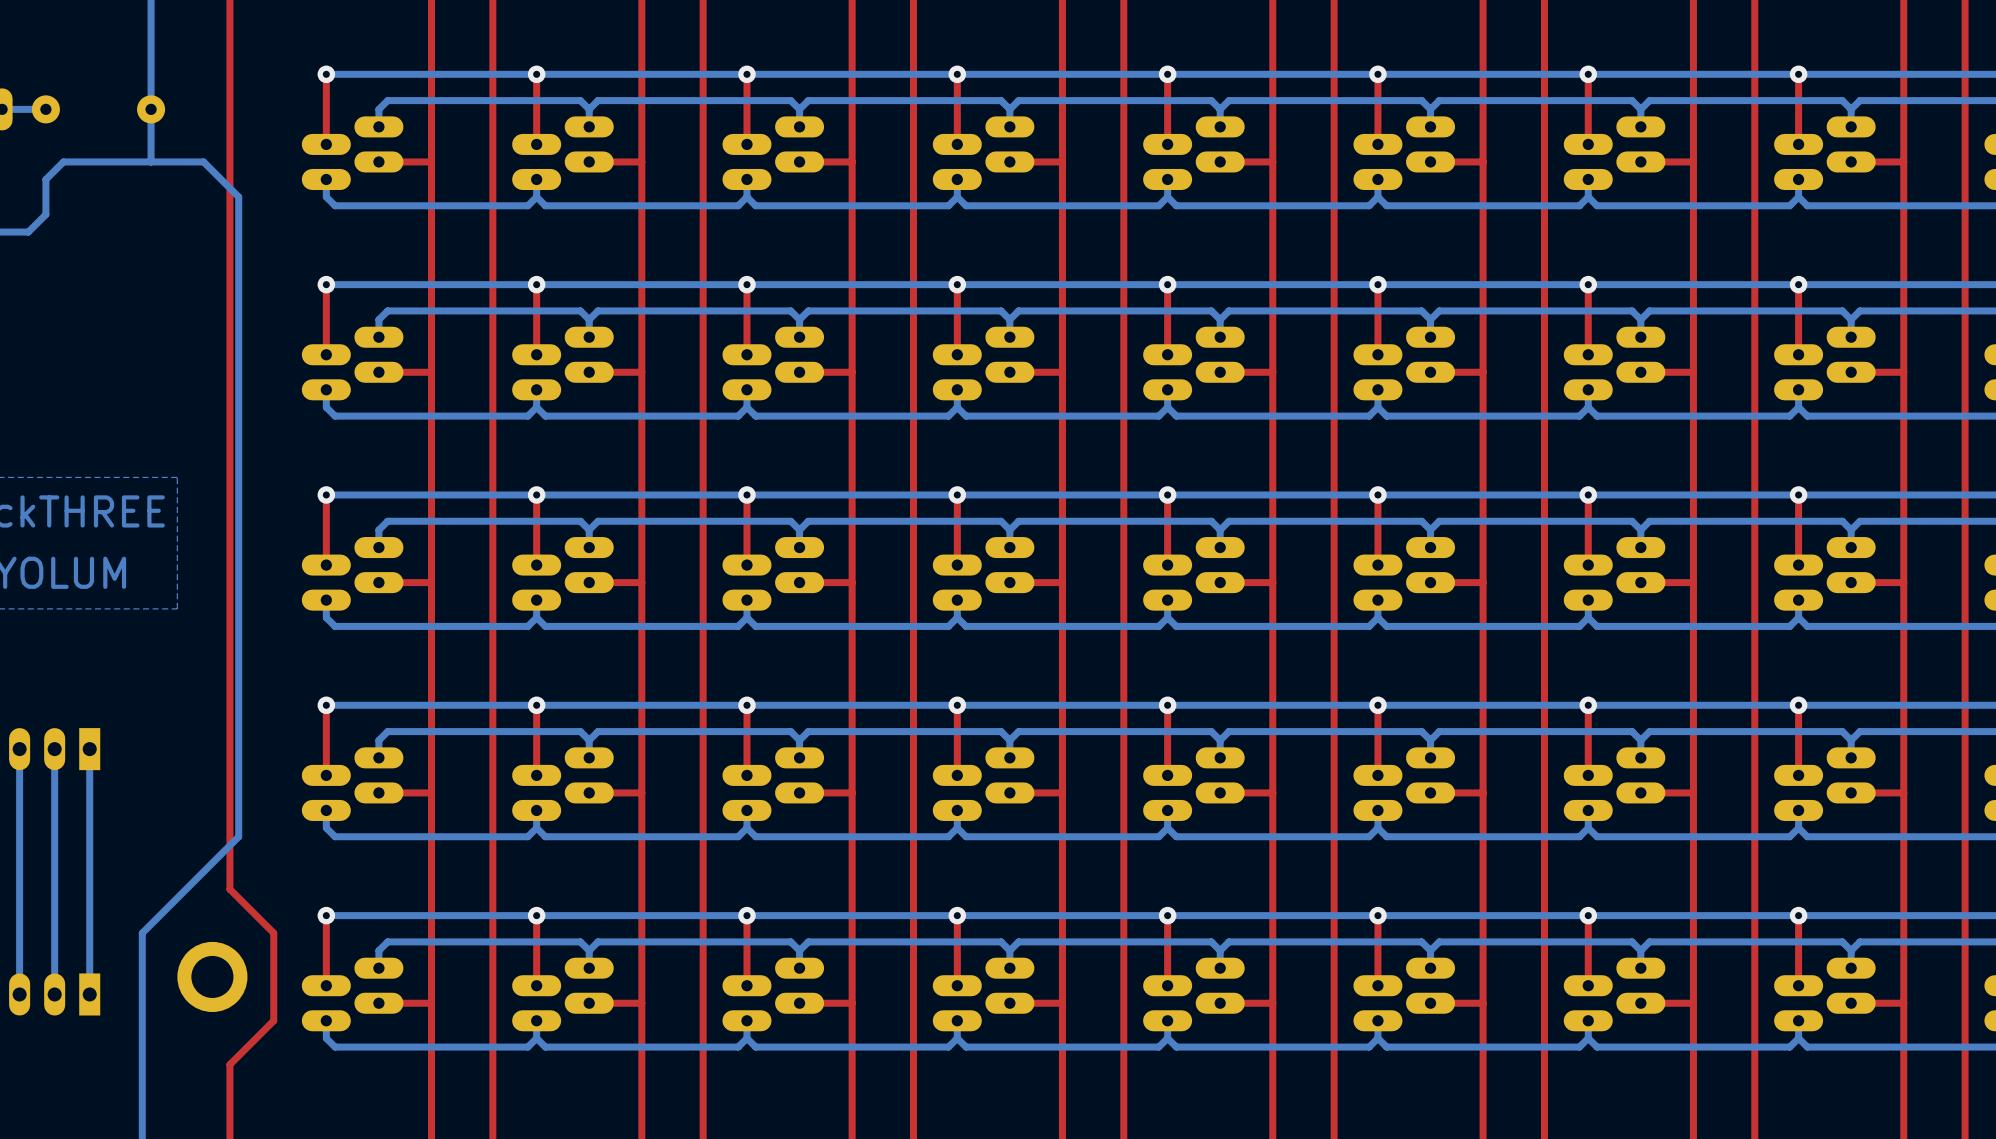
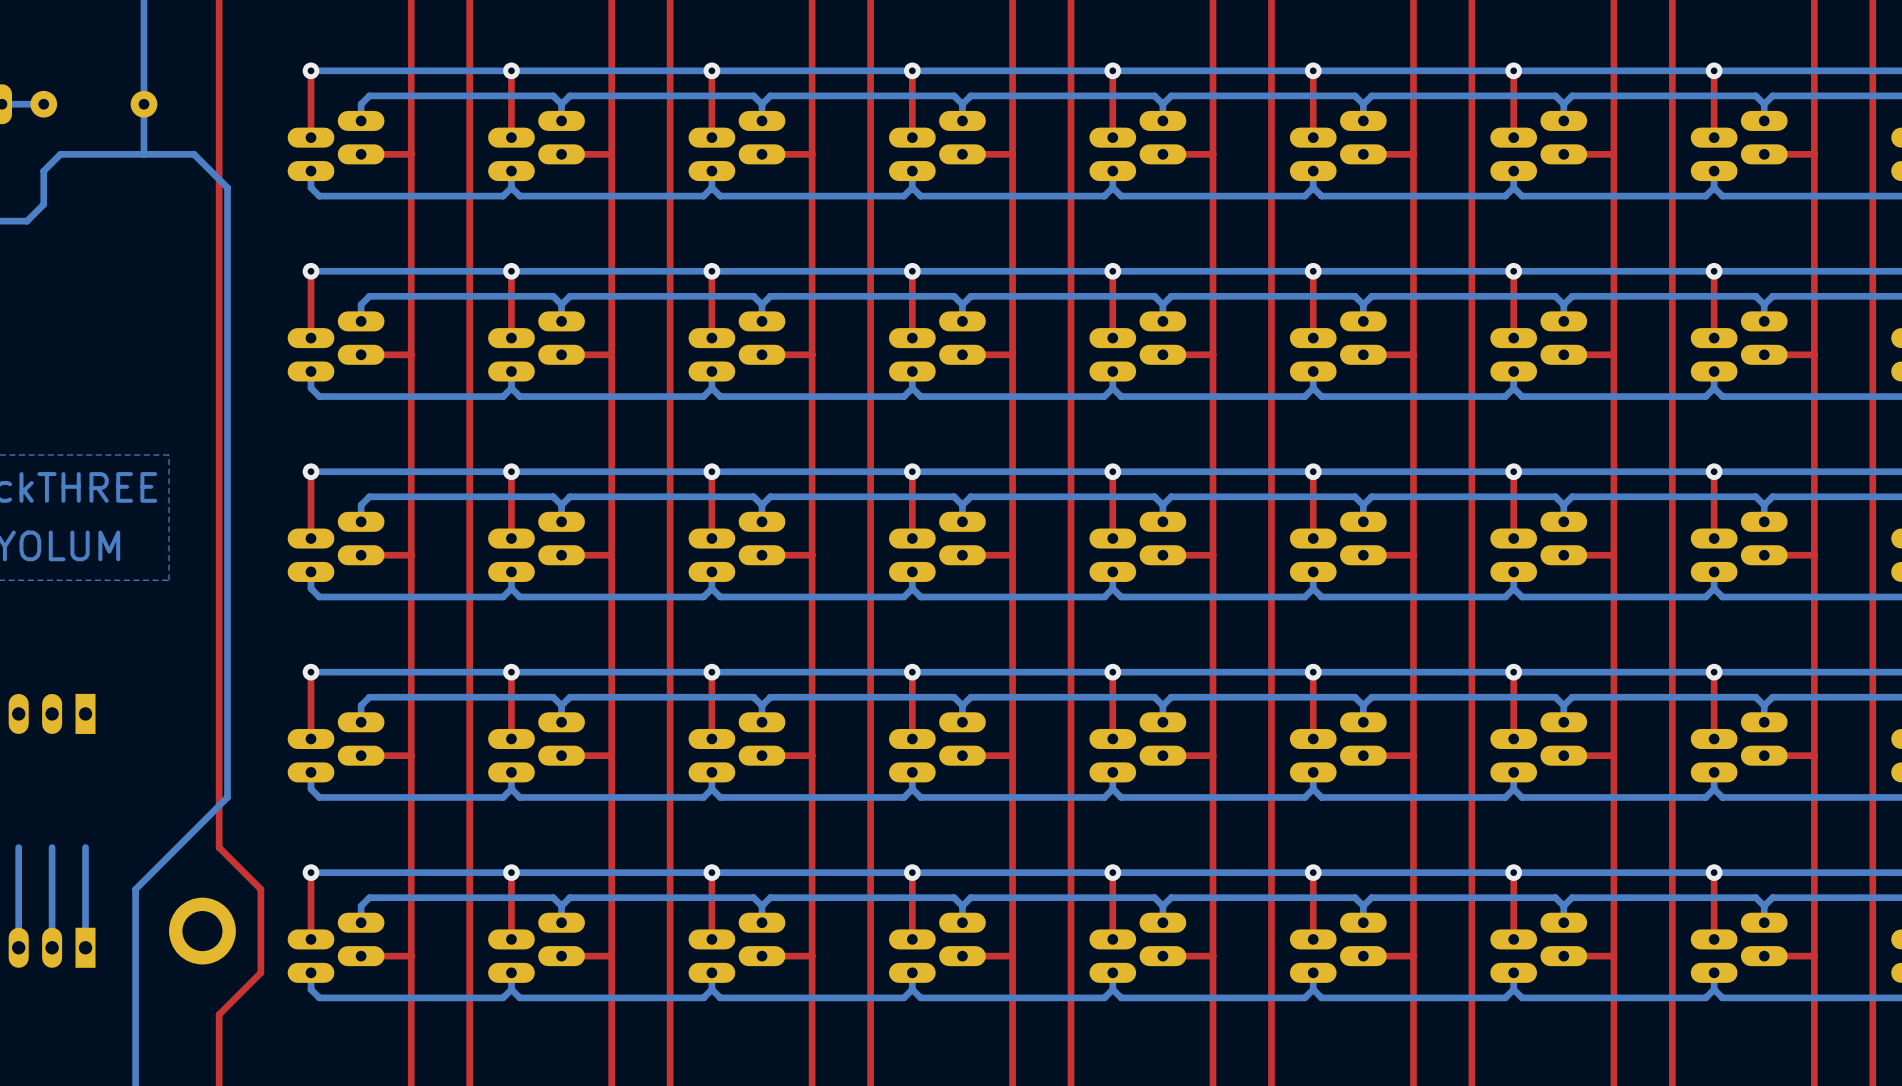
bottom track: (19, 749) (19, 889) -> none
bottom track: (54, 749) (54, 889) -> none
bottom track: (89, 749) (89, 889) -> none

